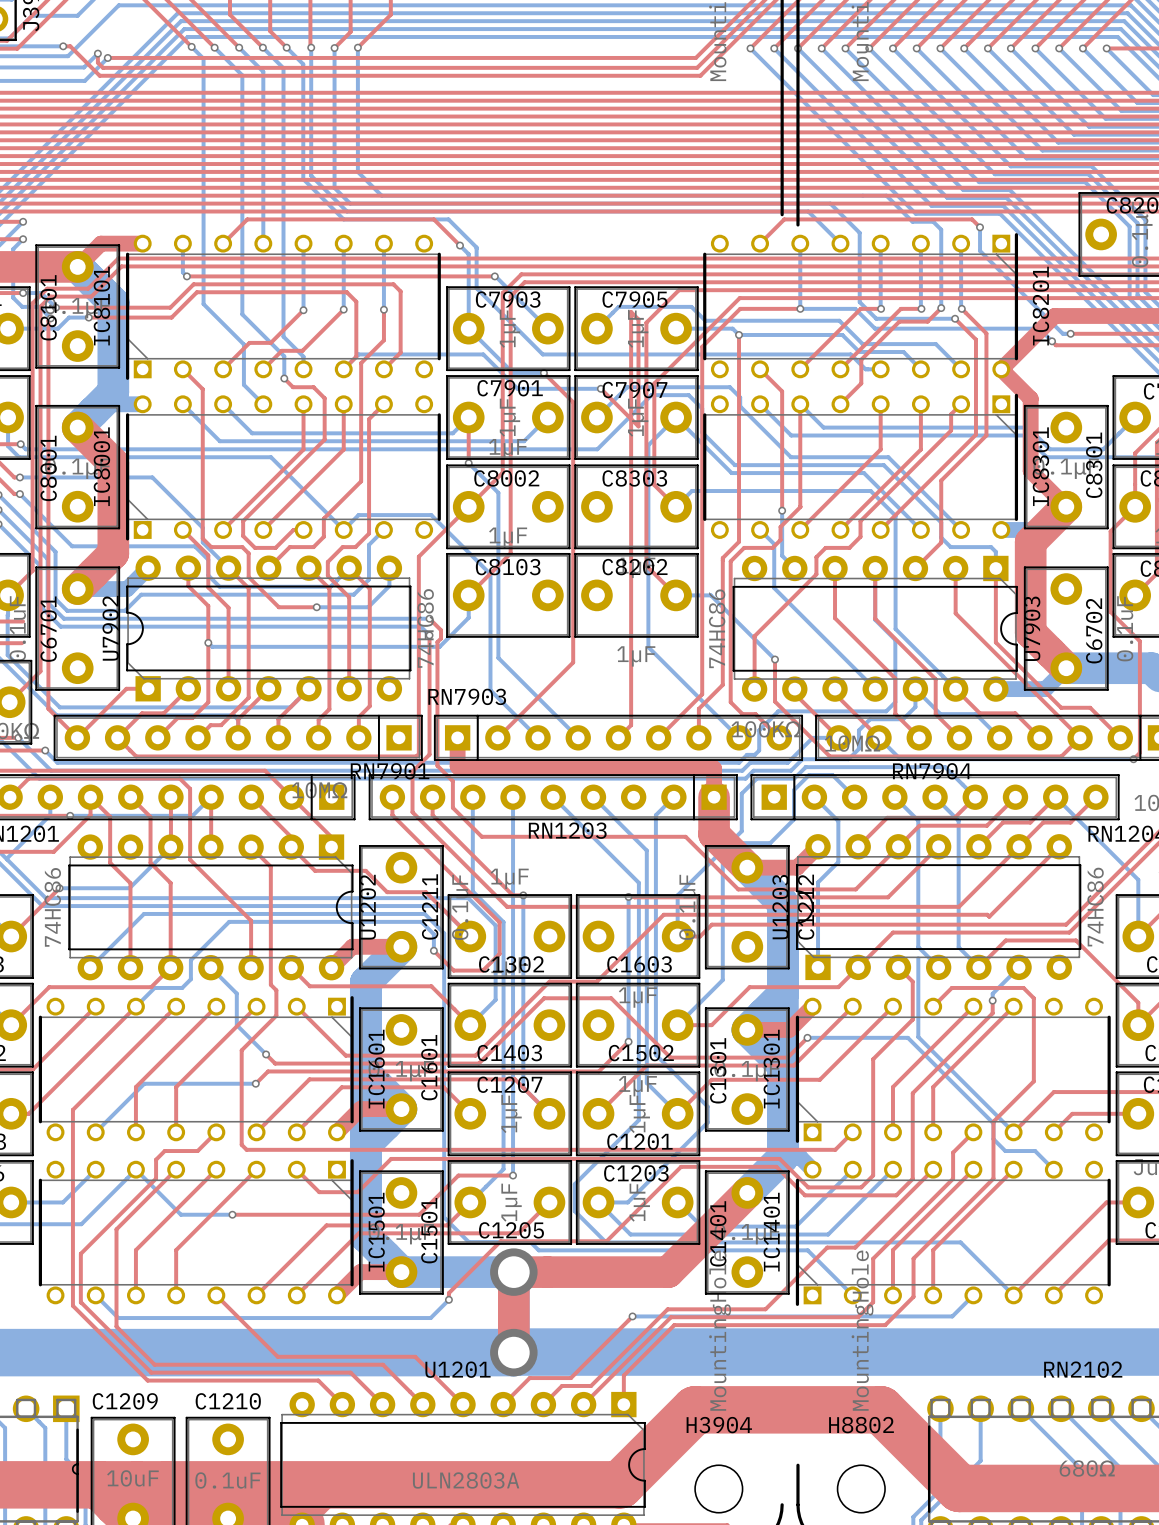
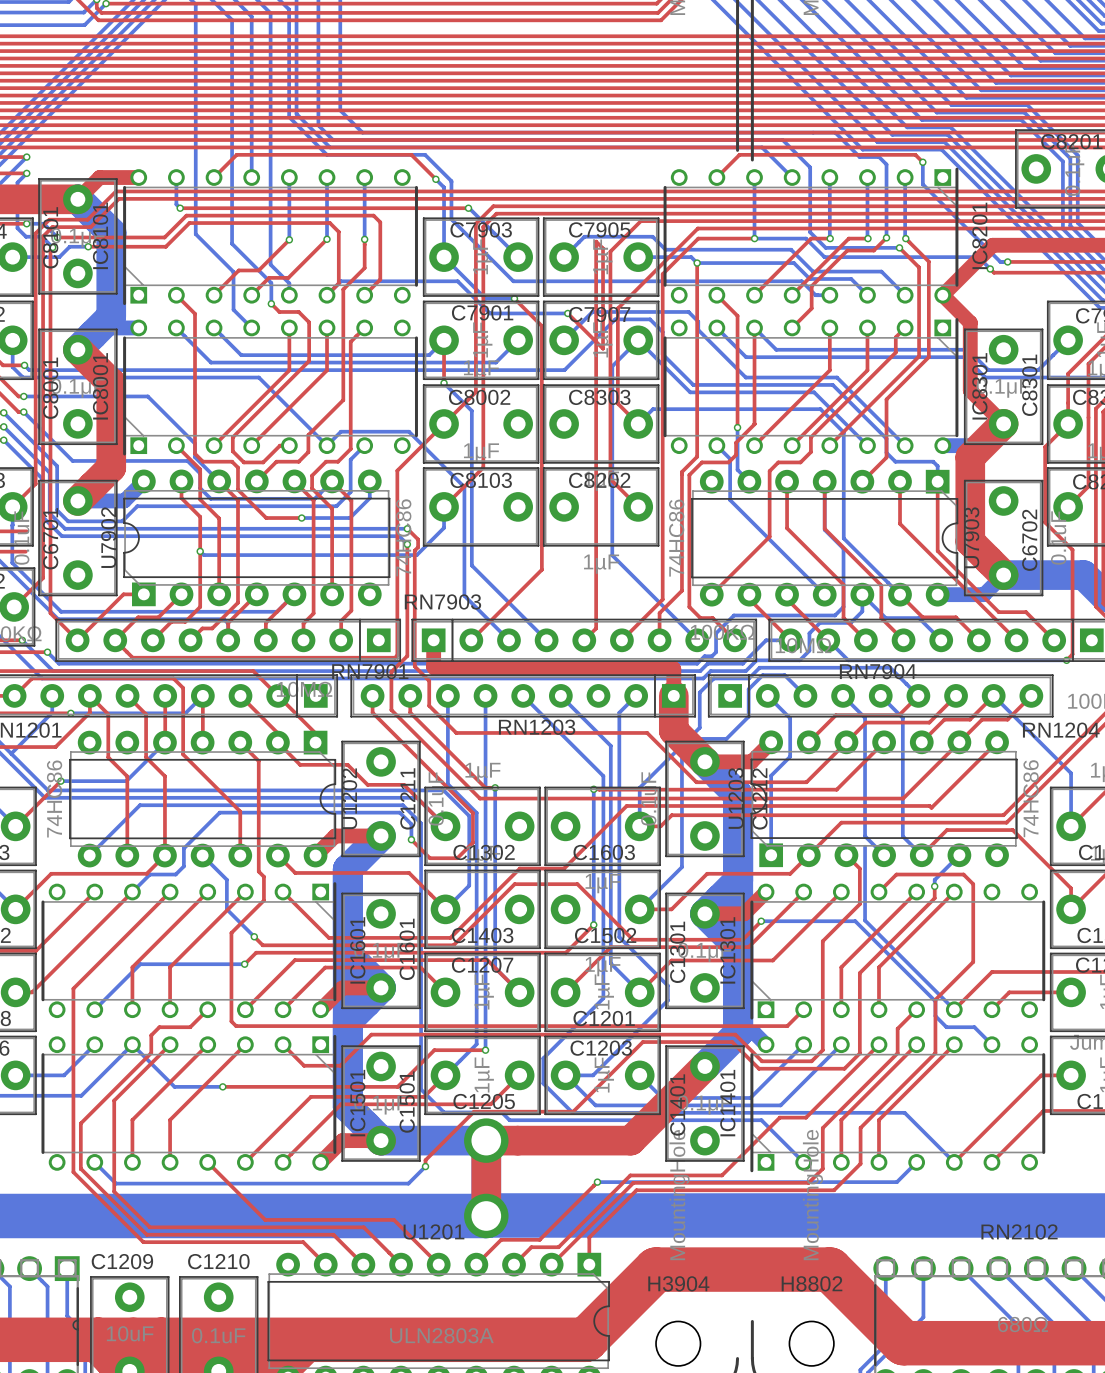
top track: (816, 574) (754, 636) -> (769, 487) (769, 536) (711, 594)
bottom track: (676, 595) (710, 595) (775, 659) -> none
top track: (754, 636) (754, 689) -> none
top track: (775, 659) (775, 701) (829, 756) (1061, 756) (1080, 737) -> none
via: (775, 659) -> none

